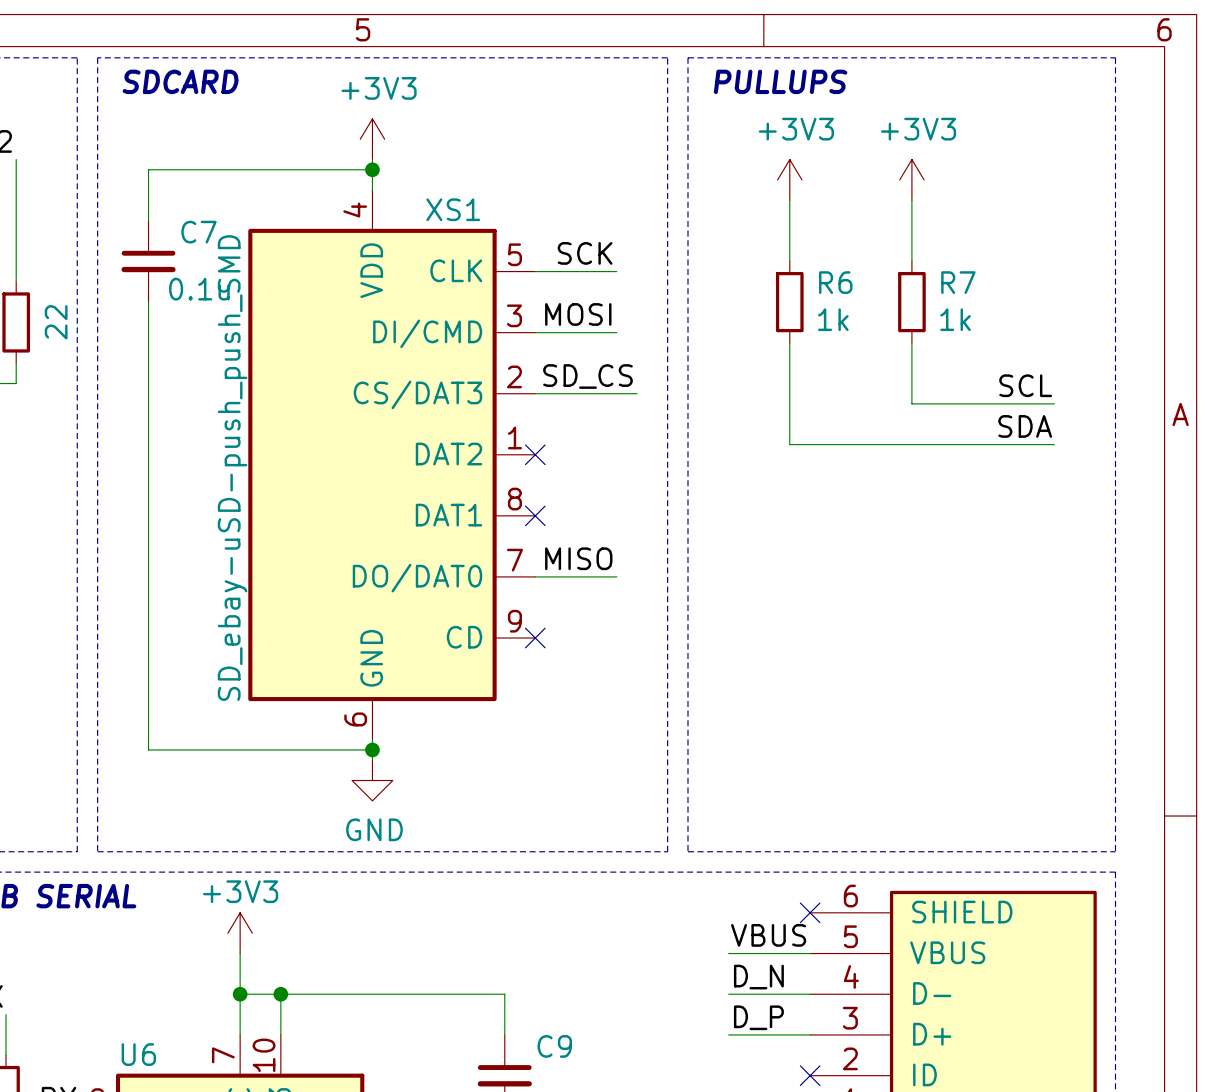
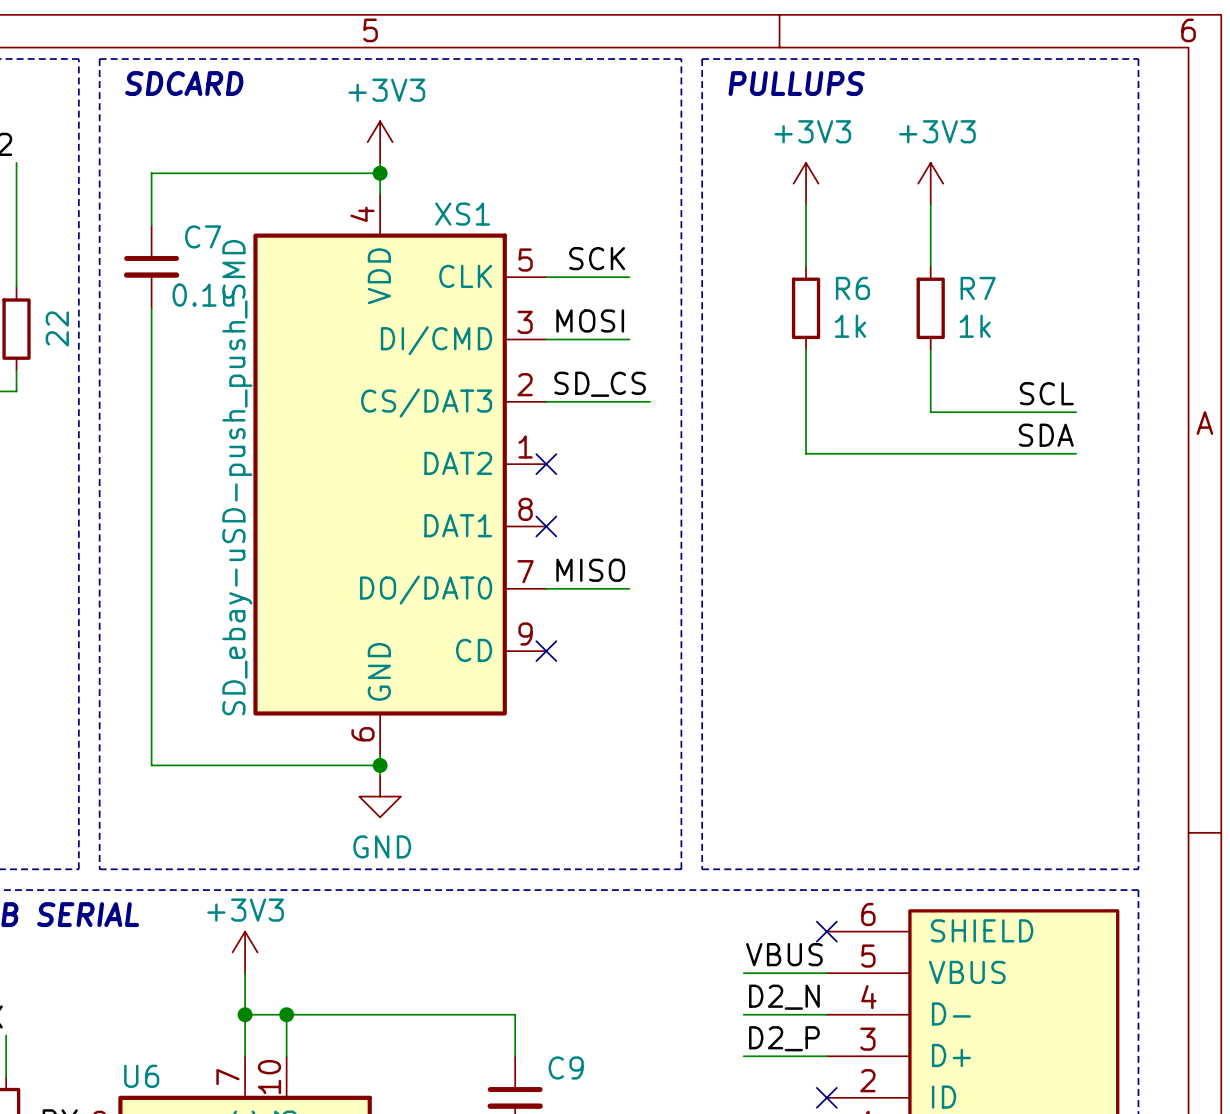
label: D_N (758, 977) -> D2_N (784, 997)
label: D_P (758, 1017) -> D2_P (784, 1038)

